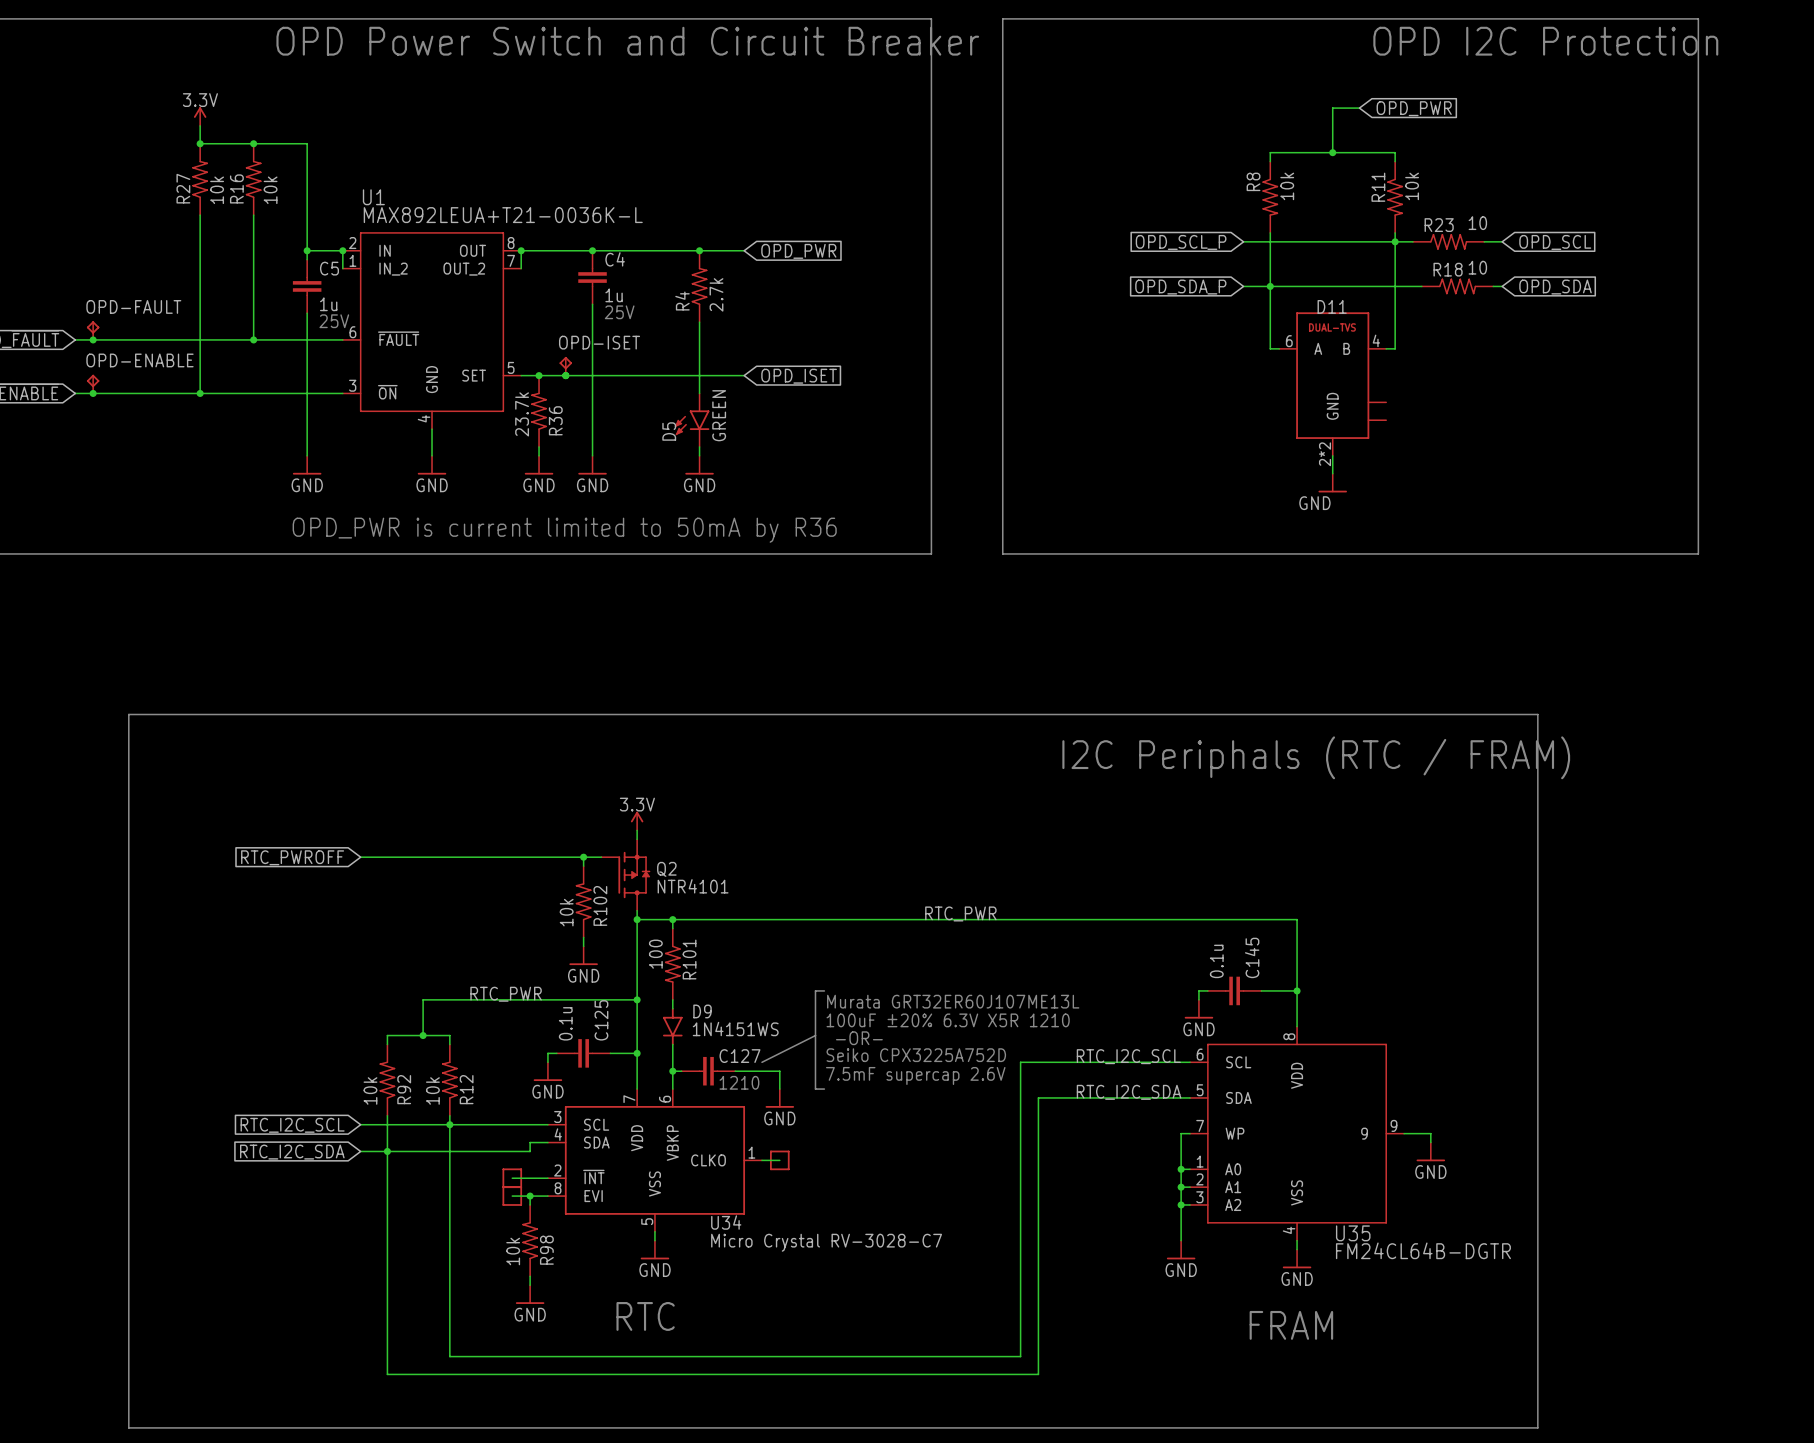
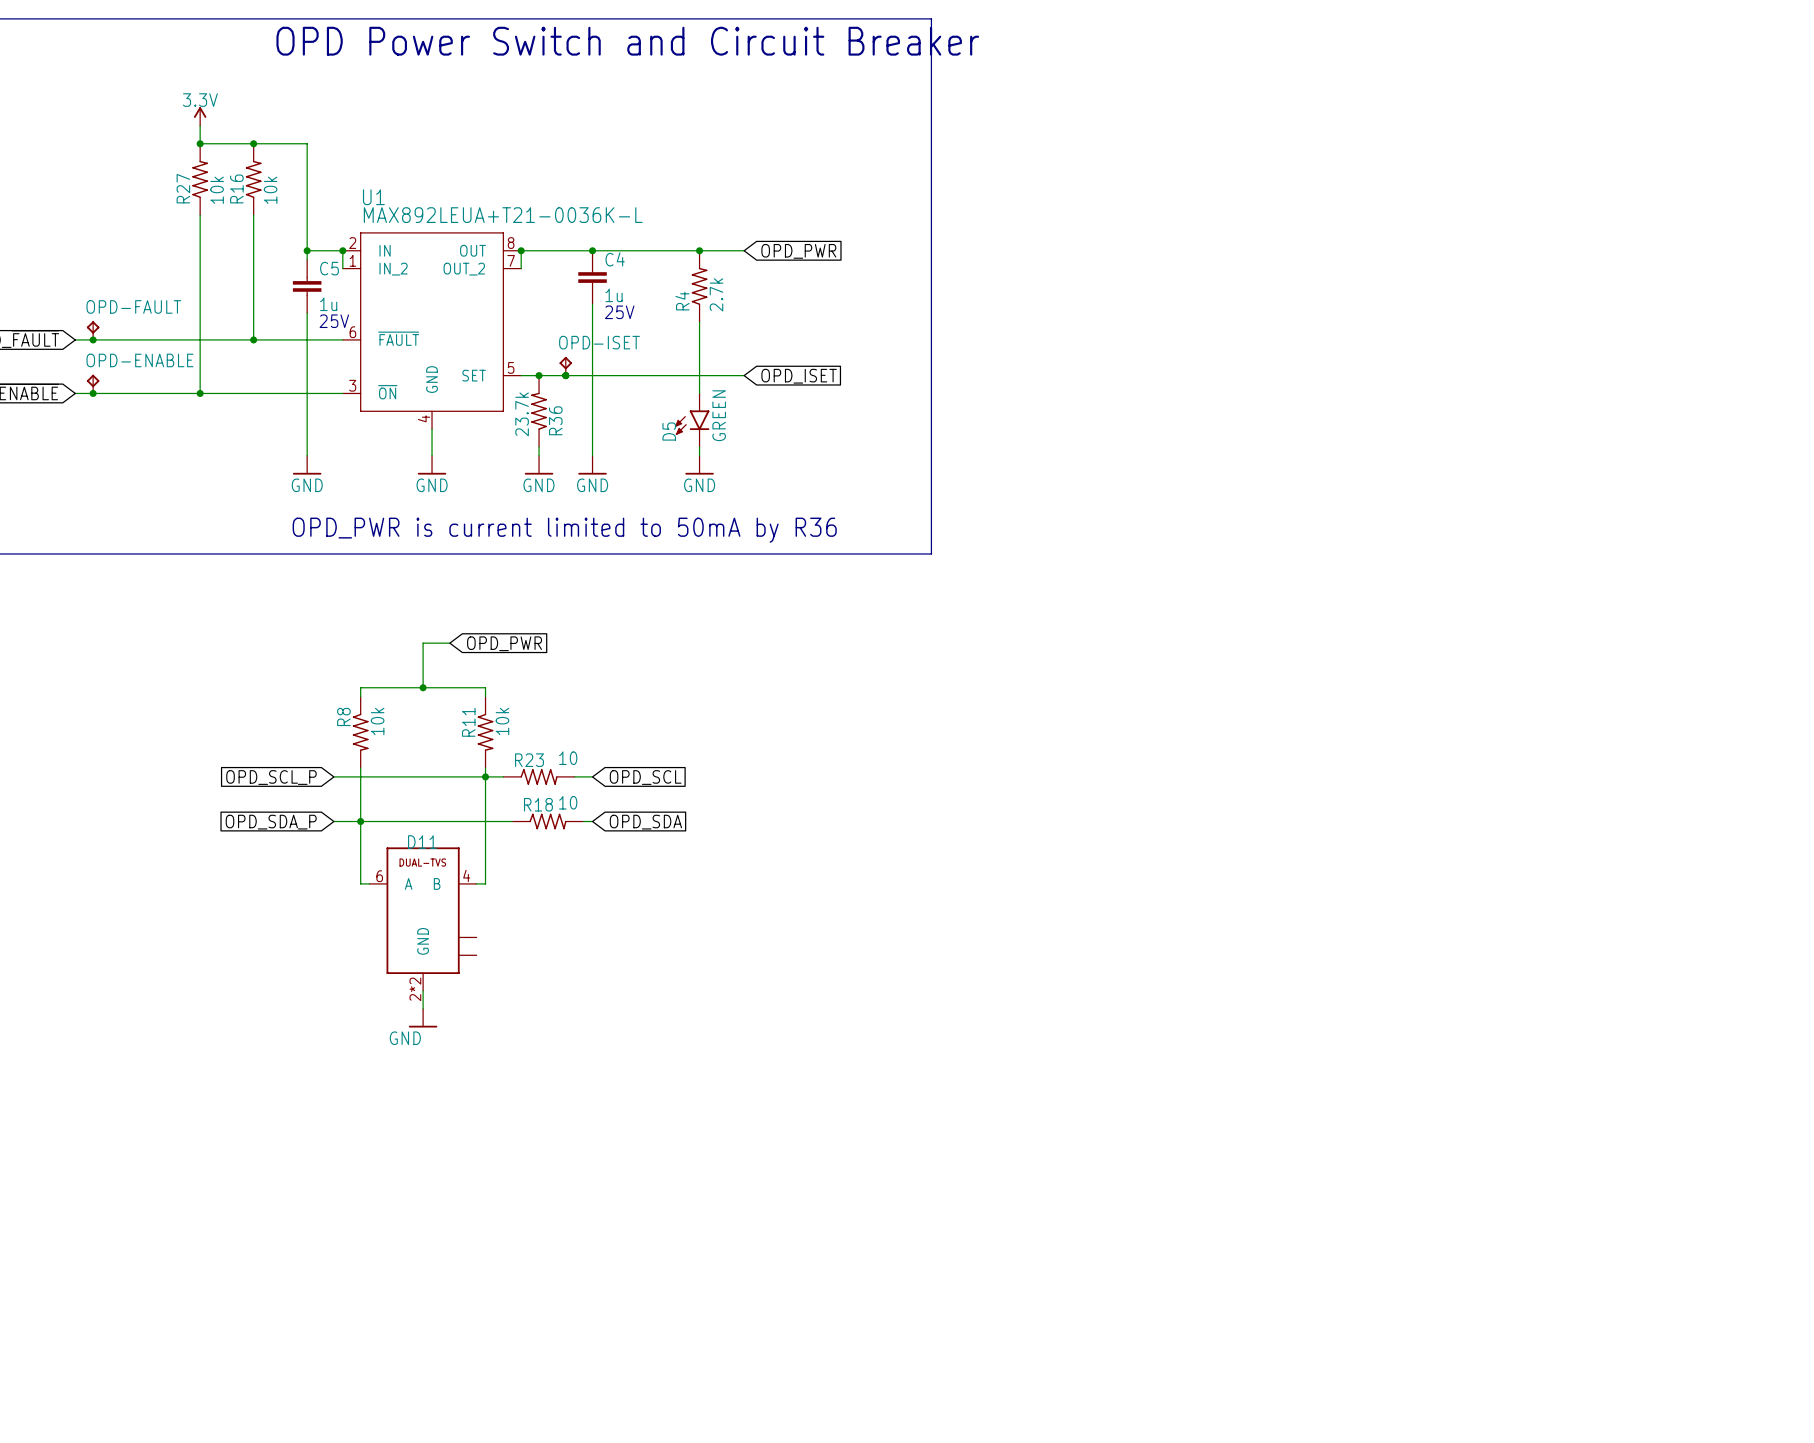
line: (1002, 18) (1698, 18) (1698, 553) (1002, 553) (1002, 18) -> none
text: OPD I2C Protection (1545, 41) -> none
wire: (1359, 108) (1332, 108) (1332, 152) -> none
global label: OPD_PWR (1414, 108) -> none
junction: (1332, 152) -> none
wire: (1270, 161) (1270, 152) (1395, 152) (1395, 161) -> none
R8 position: (1270, 197) -> (360, 732)
R11 position: (1395, 197) -> (485, 732)
wire: (1270, 232) (1270, 348) (1279, 348) -> none
wire: (1395, 232) (1395, 348) (1386, 348) -> none
wire: (1243, 241) (1412, 241) -> none
junction: (1395, 241) -> none
R23 position: (1448, 241) -> (539, 776)
wire: (1484, 241) (1502, 241) -> none
global label: OPD_SCL_P (1181, 242) -> none
global label: OPD_SCL (1555, 242) -> none
wire: (1243, 286) (1421, 286) -> none
junction: (1270, 286) -> none
R18 position: (1457, 286) -> (547, 821)
wire: (1493, 286) (1502, 286) -> none
global label: OPD_SDA_P (1180, 287) -> none
global label: OPD_SDA (1555, 287) -> none
D11 position: (1332, 384) -> (423, 919)
wire: (1332, 455) (1332, 473) -> none
power symbol: GND (1332, 483) -> none
wire: none -> (449, 643) (423, 643) (423, 687)
global label: none -> OPD_PWR (504, 643)
junction: none -> (423, 687)
wire: none -> (360, 696) (360, 687) (485, 687) (485, 696)
line: (128, 714) (1537, 714) (1537, 1427) (128, 1427) (128, 714) -> none
text: I2C Periphals (RTC / FRAM) (1316, 757) -> none
wire: none -> (360, 768) (360, 883) (369, 883)
wire: none -> (485, 768) (485, 883) (476, 883)
wire: none -> (333, 776) (503, 776)
junction: none -> (485, 776)
wire: none -> (574, 776) (592, 776)
global label: none -> OPD_SCL_P (271, 777)
global label: none -> OPD_SCL (645, 777)
wire: none -> (333, 821) (512, 821)
junction: none -> (360, 821)
wire: none -> (583, 821) (592, 821)
power symbol: 3.3V (637, 821) -> none
global label: none -> OPD_SDA_P (271, 822)
global label: none -> OPD_SDA (645, 822)
wire: (637, 830) (637, 839) -> none
global label: RTC_PWROFF (292, 857) -> none
wire: (360, 857) (601, 857) -> none
wire: (583, 857) (583, 866) -> none
junction: (583, 857) -> none
Q2: NTR4101 (625, 875) -> none
R102: 10k (583, 901) -> none
wire: (637, 910) (637, 1089) -> none
label: RTC_PWR (960, 913) -> none
wire: (637, 919) (1297, 919) (1297, 1026) -> none
junction: (637, 919) -> none
wire: (672, 919) (672, 928) -> none
junction: (672, 919) -> none
wire: (583, 937) (583, 946) -> none
power symbol: GND (583, 955) -> none
R101: 100 (672, 964) -> none
line: (824, 990) (815, 990) (815, 1089) (824, 1089) -> none
wire: (1207, 990) (1198, 990) (1198, 999) -> none
C145: 0.1u (1234, 990) -> none
wire: (1261, 990) (1297, 990) -> none
junction: (1297, 990) -> none
label: RTC_PWR (506, 994) -> none
wire: (423, 999) (637, 999) -> (423, 999) (423, 990)
junction: (637, 999) -> none
wire: (672, 999) (672, 1008) -> none
text: Murata GRT32ER60J107ME13L (953, 1001) -> none
power symbol: GND (1198, 1009) -> none
power symbol: none -> GND (423, 1018)
text: 100uF ±20% 6.3V X5R 1210 (948, 1020) -> none
D9: 1N4151WS (672, 1026) -> none
junction: (423, 1035) -> none
line: (815, 1035) (761, 1062) -> none
text: -OR- (859, 1038) -> none
wire: (387, 1044) (387, 1035) (449, 1035) (449, 1044) -> none
wire: (672, 1044) (672, 1089) -> none
wire: (556, 1053) (547, 1053) (547, 1062) -> none
C125: 0.1u (583, 1053) -> none
wire: (610, 1053) (637, 1053) -> none
junction: (637, 1053) -> none
text: Seiko CPX3225A752D (916, 1055) -> none
label: RTC_I2C_SCL (1128, 1056) -> none
wire: (1190, 1062) (1020, 1062) (1020, 1356) (449, 1356) (449, 1115) -> none
power symbol: GND (547, 1071) -> none
wire: (672, 1071) (681, 1071) -> none
junction: (672, 1071) -> none
C127: (708, 1071) -> none
wire: (735, 1071) (779, 1071) (779, 1089) -> none
text: 7.5mF supercap 2.6V (915, 1075) -> none
R92: 10k (387, 1080) -> none
R12: 10k (449, 1080) -> none
text: 1210 (739, 1082) -> none
label: RTC_I2C_SDA (1129, 1092) -> none
wire: (1190, 1097) (1038, 1097) (1038, 1374) (387, 1374) (387, 1115) -> none
power symbol: GND (779, 1098) -> none
wire: (360, 1124) (547, 1124) -> none
junction: (449, 1124) -> none
global label: RTC_I2C_SCL (292, 1125) -> none
wire: (1190, 1133) (1181, 1133) (1181, 1240) -> none
U35: FM24CL64B-DGTR (1297, 1133) -> none
wire: (1404, 1133) (1430, 1133) (1430, 1142) -> none
wire: (547, 1142) (530, 1142) (530, 1151) (360, 1151) -> none
junction: (387, 1151) -> none
power symbol: GND (1430, 1151) -> none
global label: RTC_I2C_SDA (292, 1152) -> none
U34: Micro Crystal RV-3028-C7 (654, 1160) -> none
wire: (761, 1160) (779, 1160) -> none
part: (779, 1160) -> none
wire: (1181, 1169) (1190, 1169) -> none
junction: (1181, 1169) -> none
wire: (512, 1178) (547, 1178) -> none
part: (512, 1178) -> none
wire: (1181, 1187) (1190, 1187) -> none
junction: (1181, 1187) -> none
wire: (512, 1196) (547, 1196) -> none
part: (512, 1196) -> none
wire: (530, 1196) (530, 1204) -> none
junction: (530, 1196) -> none
wire: (1181, 1204) (1190, 1204) -> none
junction: (1181, 1204) -> none
wire: (654, 1231) (654, 1240) -> none
R98: 10k (530, 1240) -> none
wire: (1297, 1240) (1297, 1249) -> none
power symbol: GND (654, 1250) -> none
power symbol: GND (1181, 1250) -> none
power symbol: GND (1297, 1258) -> none
wire: (530, 1276) (530, 1285) -> none
power symbol: GND (530, 1294) -> none
text: RTC (645, 1316) -> none
text: FRAM (1291, 1325) -> none

